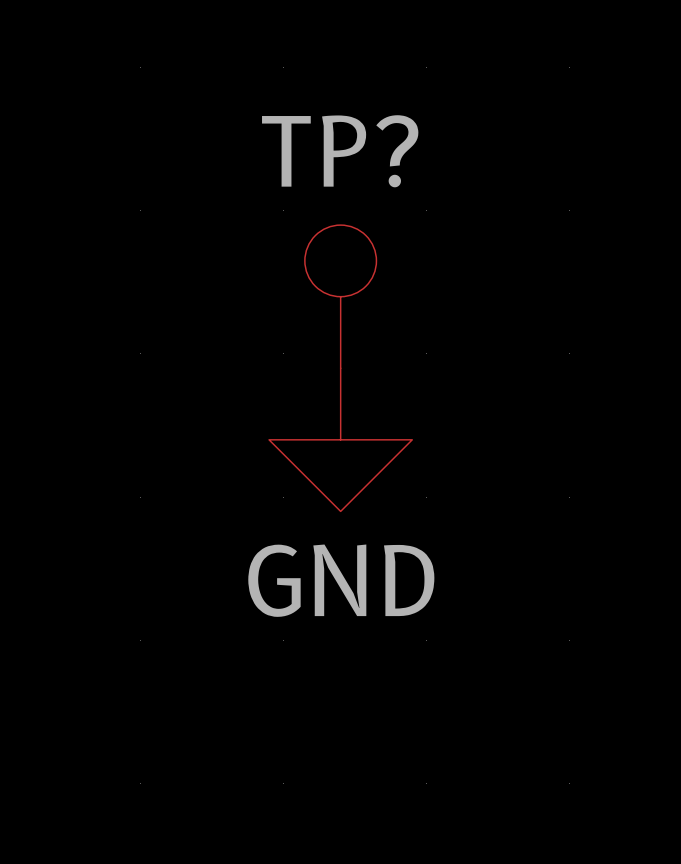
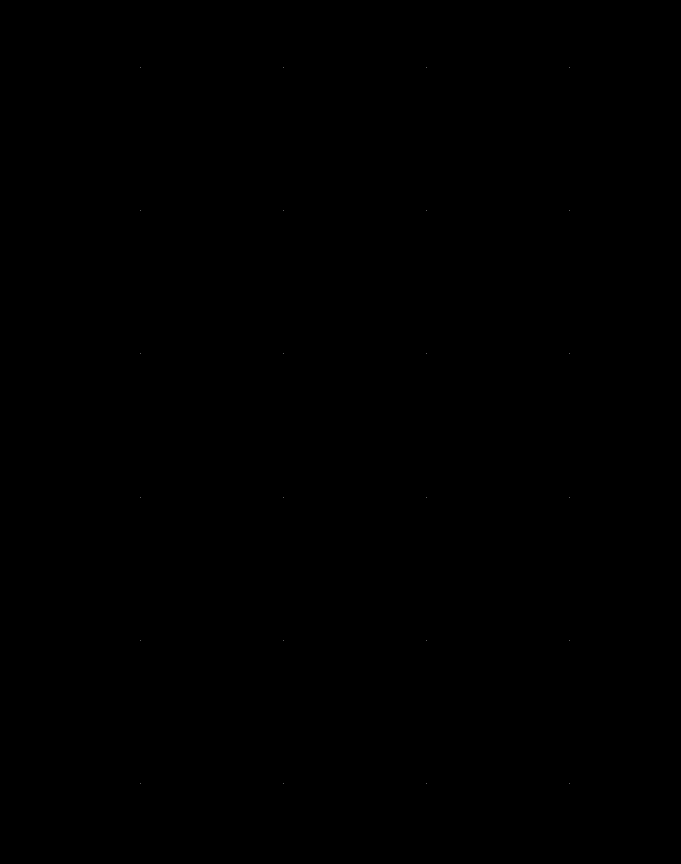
TP?: (340, 296) -> none
power symbol: GND (340, 439) -> none

